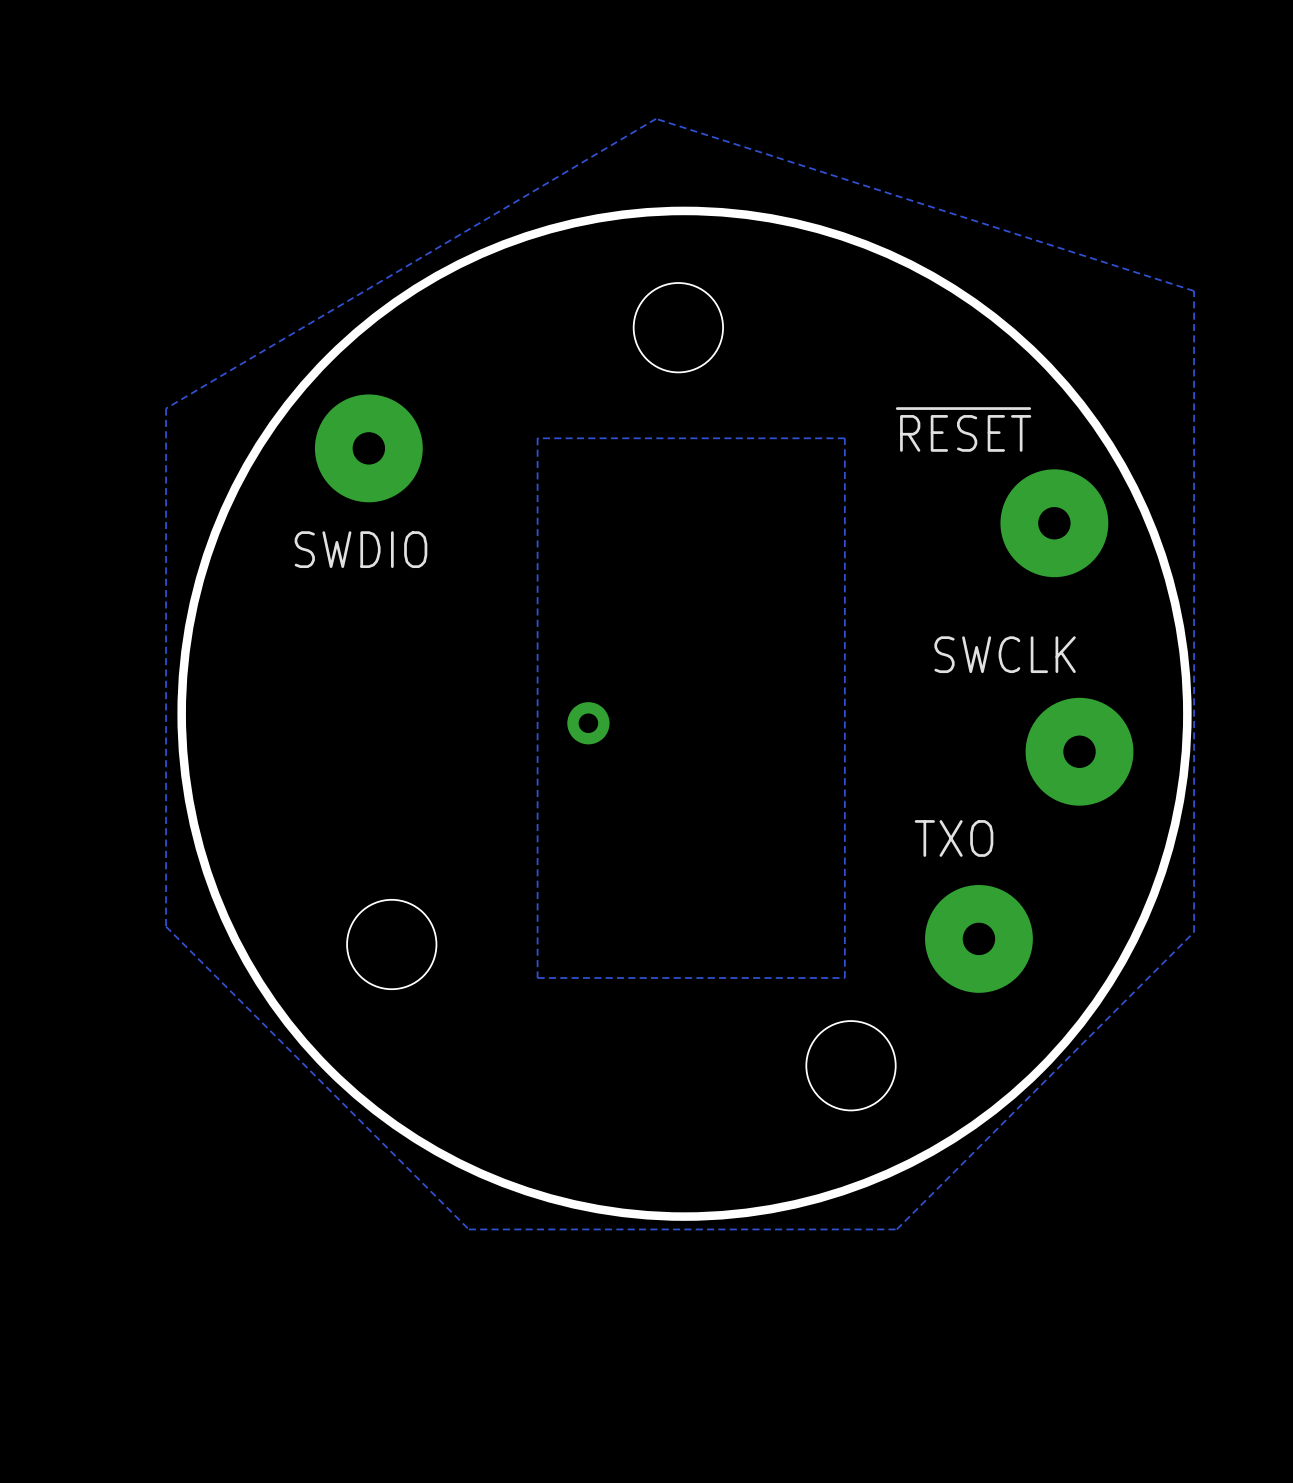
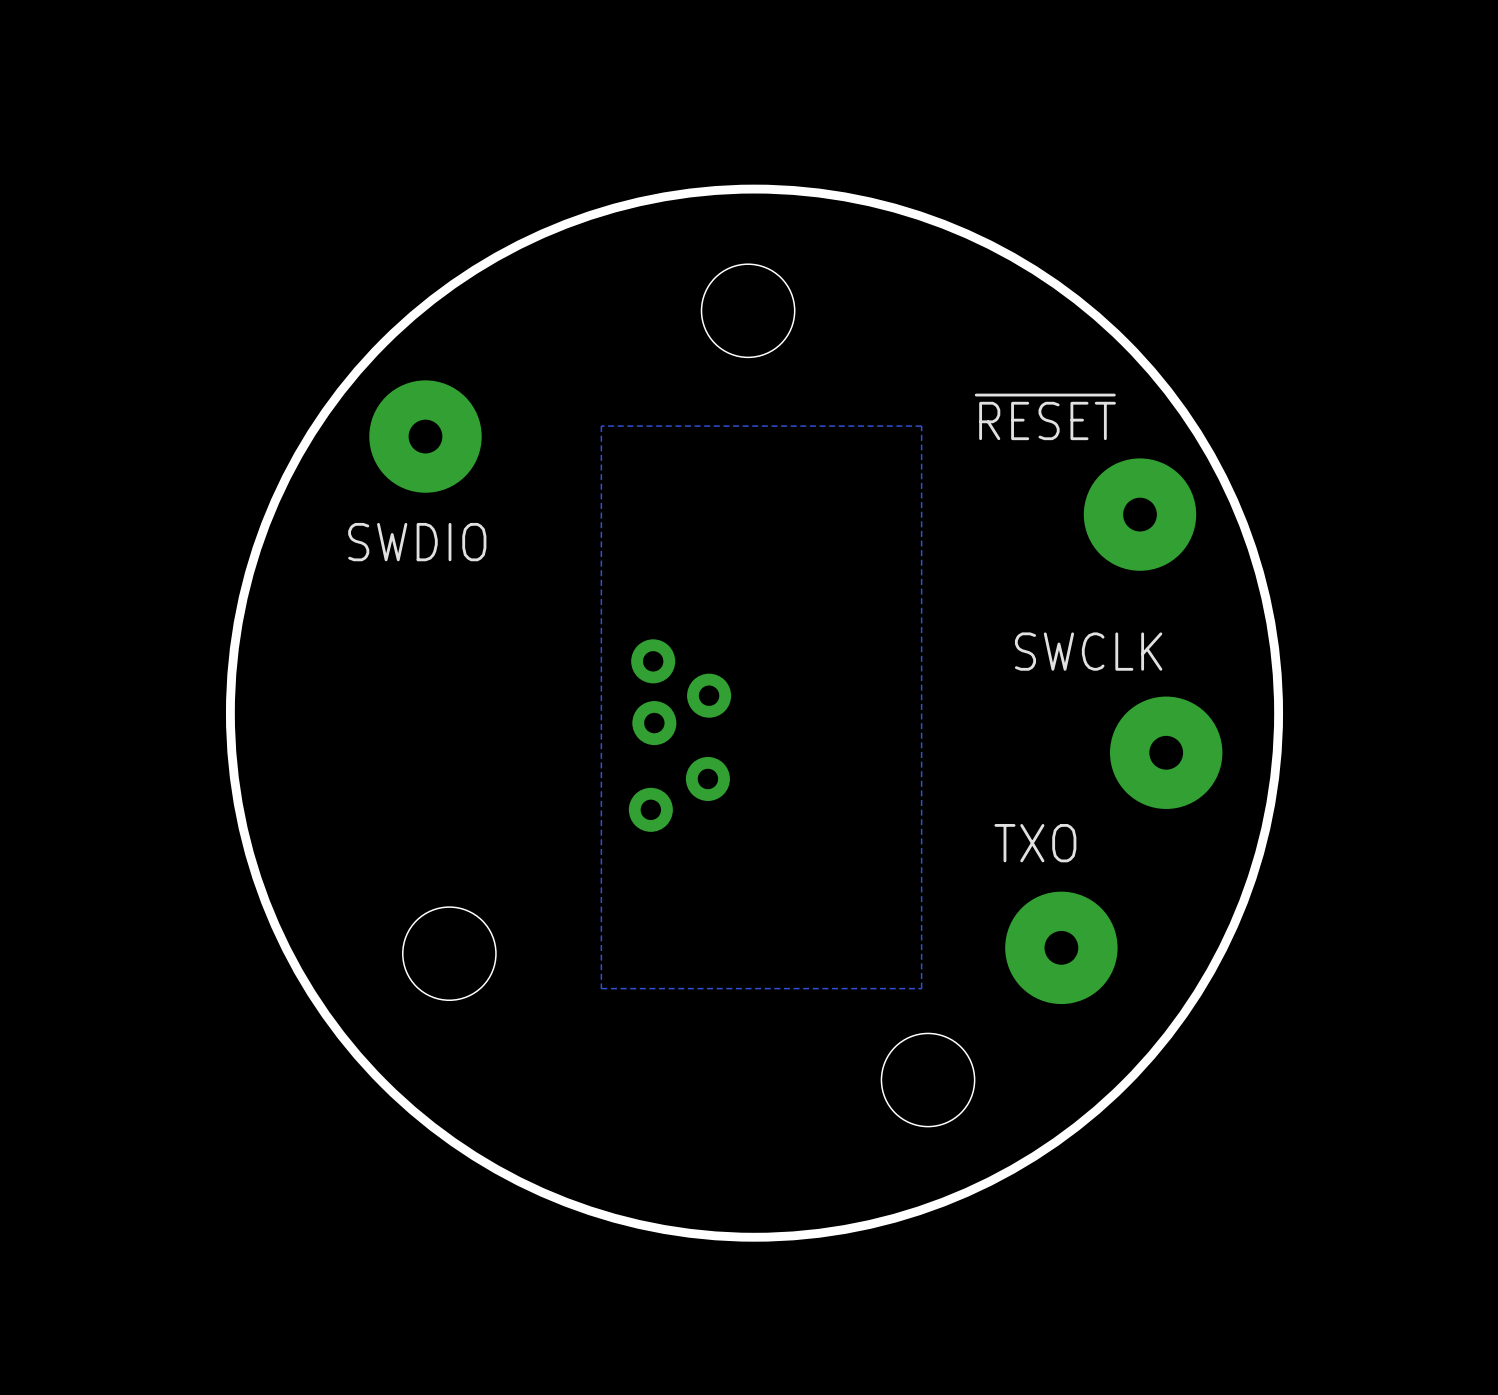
zone outline: (656, 118) (166, 408) (166, 926) (468, 1229) (896, 1229) (1194, 932) (1194, 291) (656, 118) -> none
via: none -> (653, 661)
via: none -> (709, 695)
via: none -> (707, 778)
via: none -> (650, 809)

